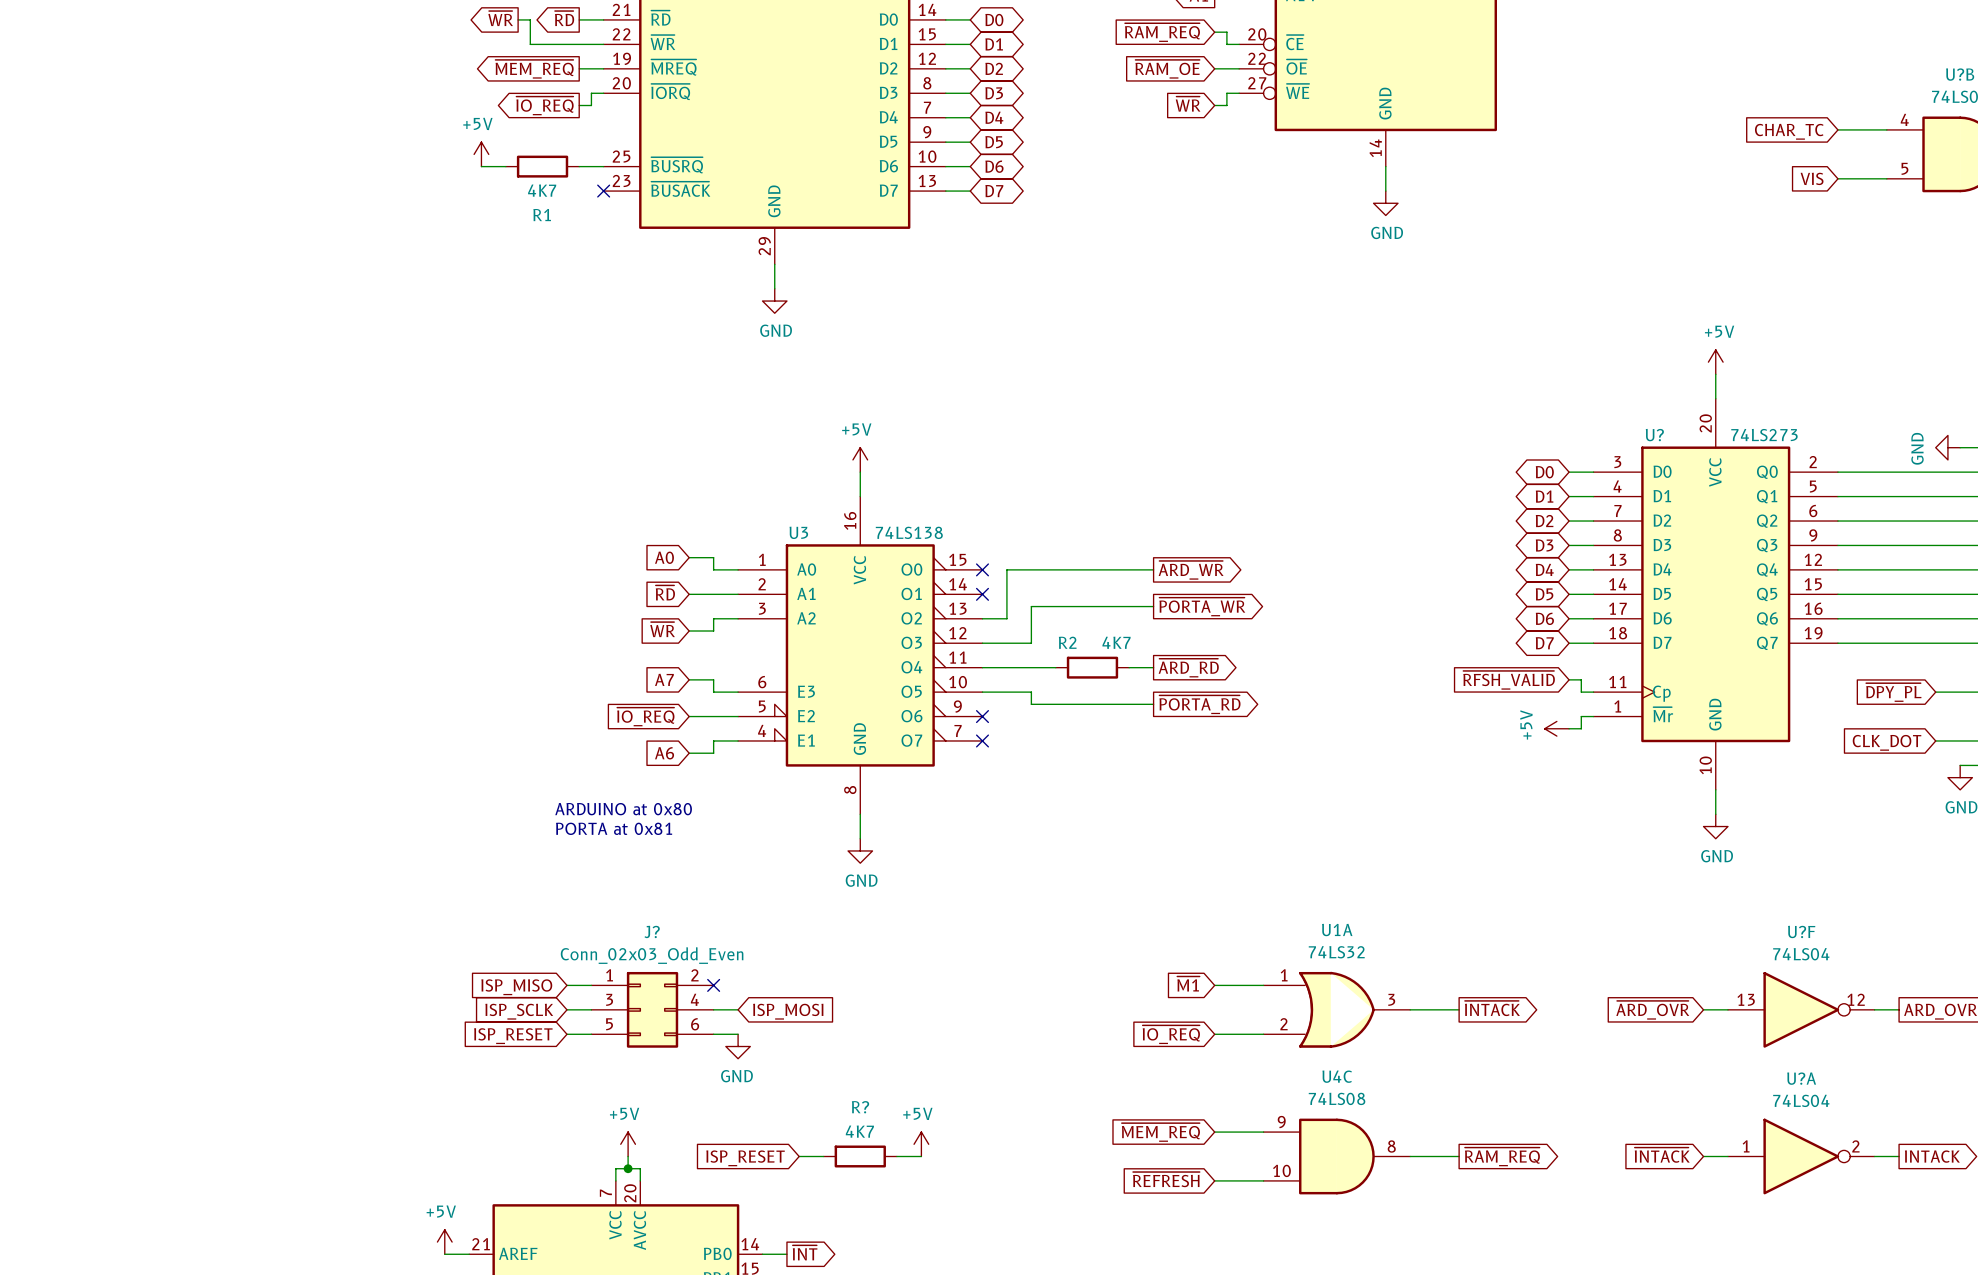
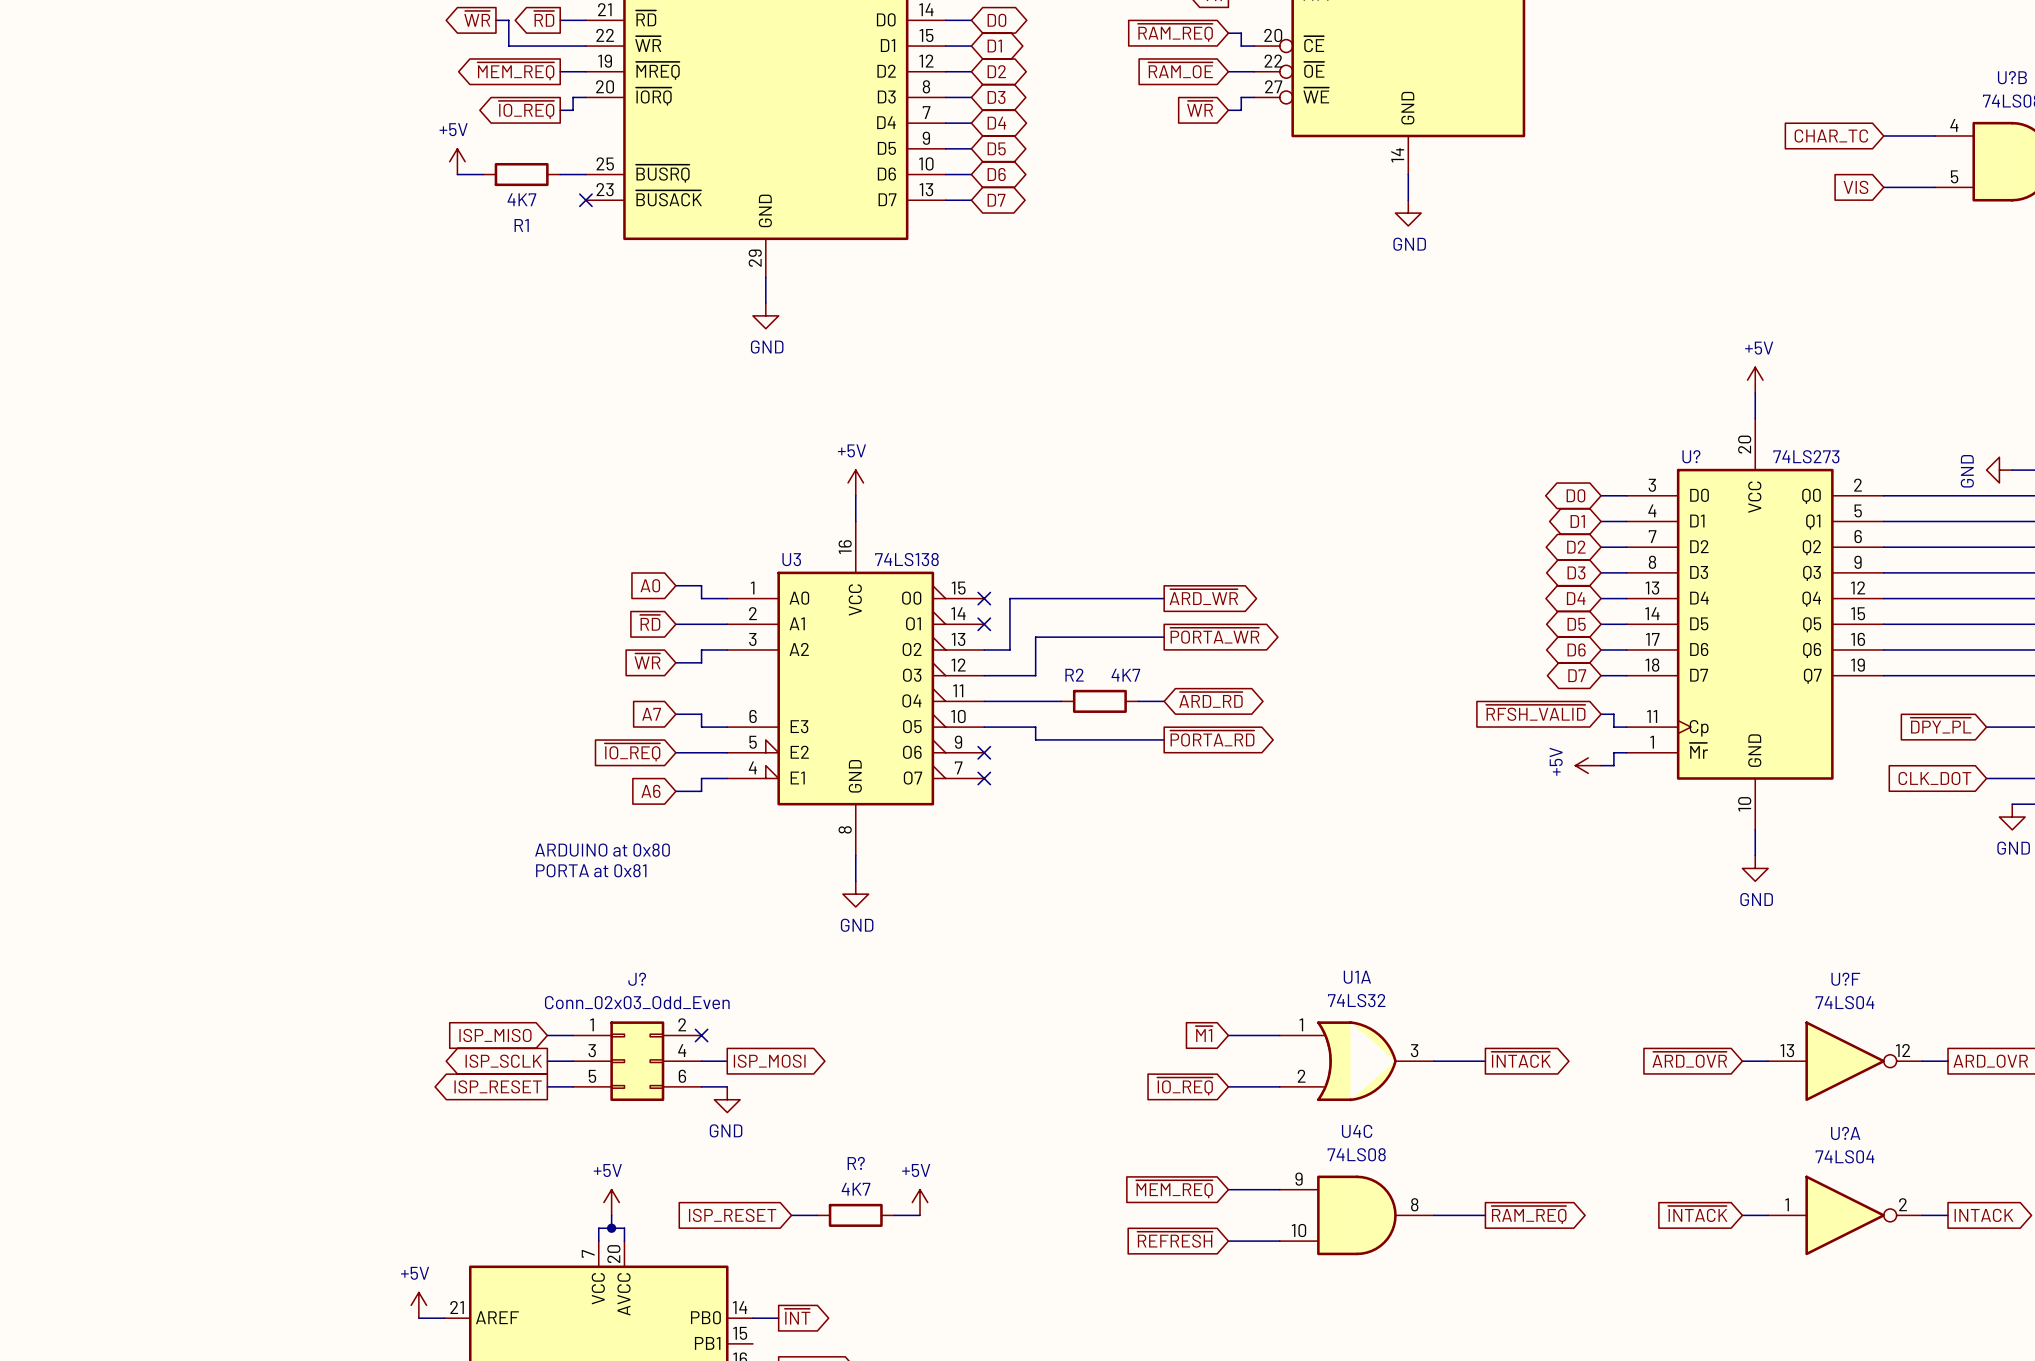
global label shape: output (1188, 668) -> bidirectional (1210, 699)
global label shape: input (519, 1011) -> output (503, 1061)
global label shape: input (788, 1011) -> output (769, 1061)
global label shape: input (513, 1036) -> output (498, 1086)

